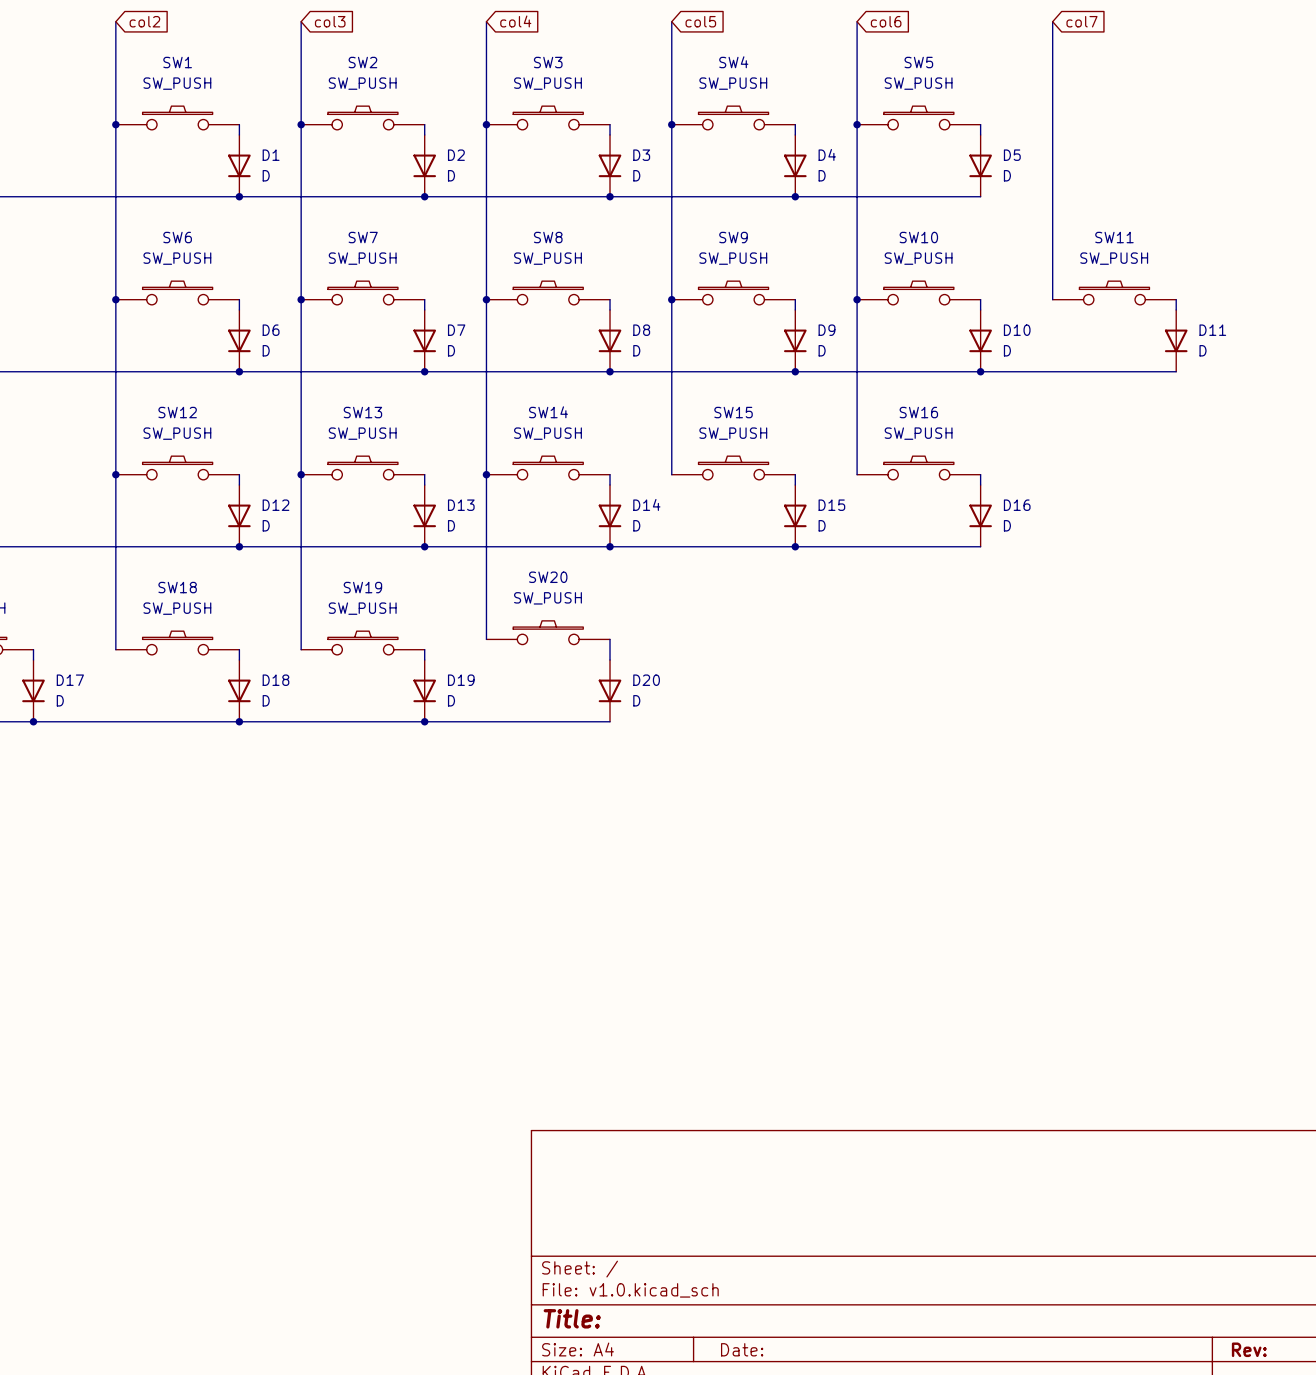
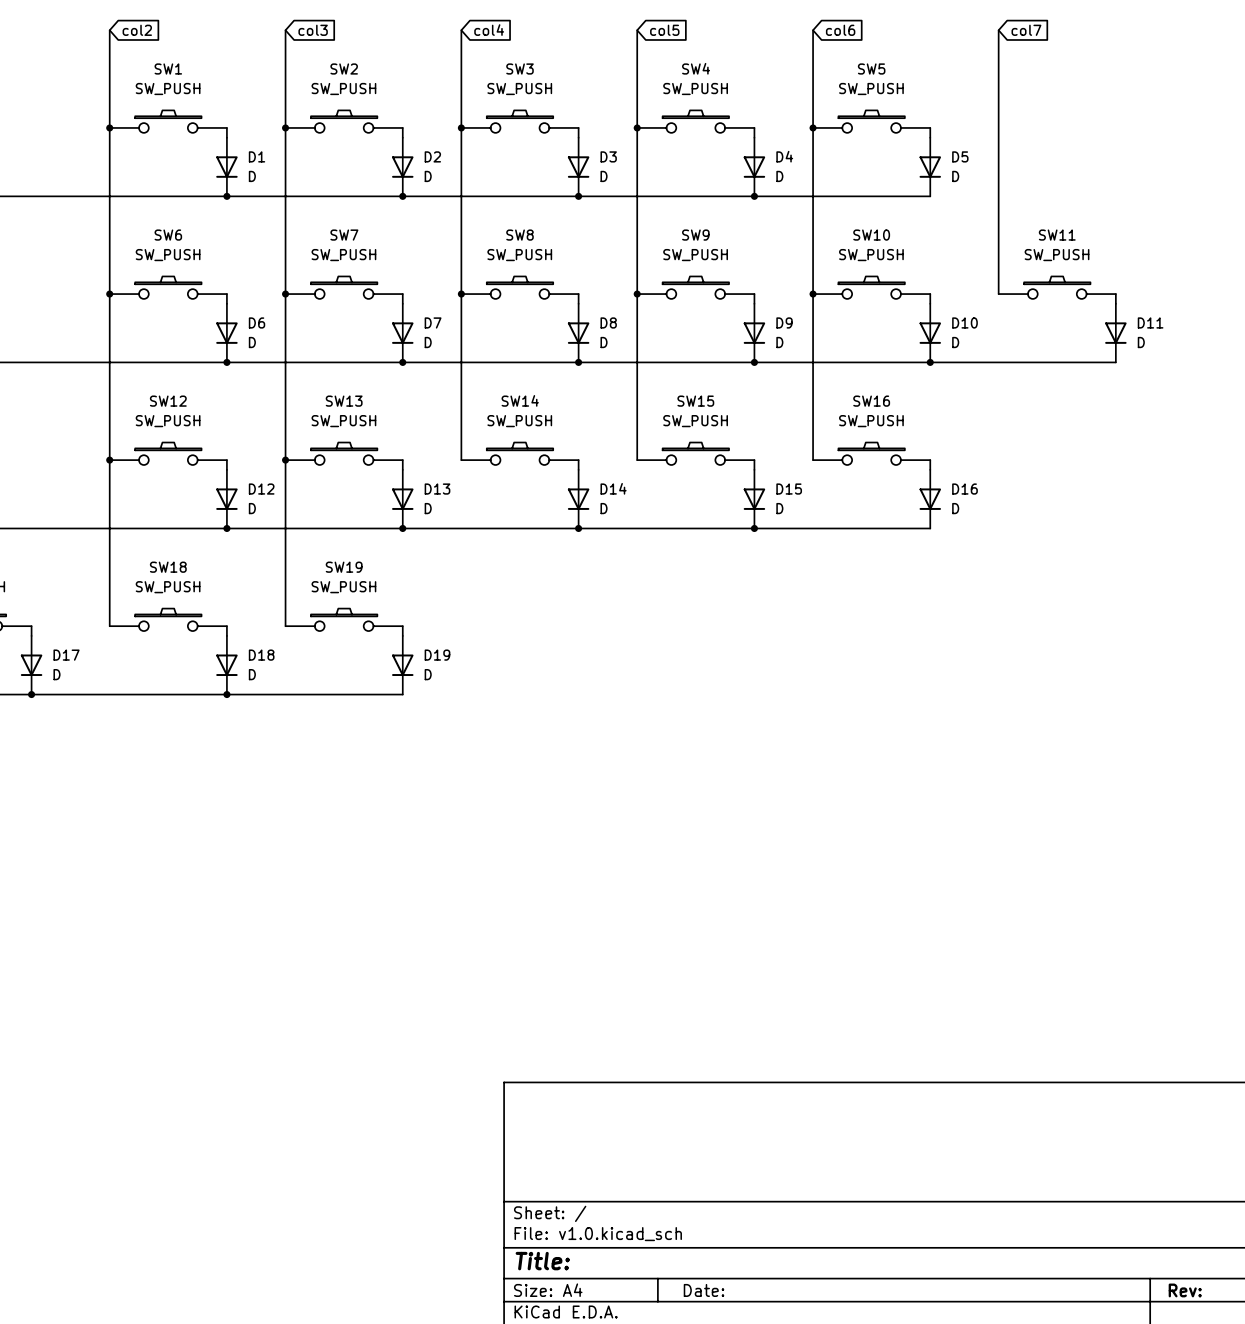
wire: (486, 474) (486, 639) -> none
junction: (486, 474) -> none
SW20: SW_PUSH (548, 632) -> none
wire: (610, 639) (610, 660) -> none
D20: D (610, 690) -> none
wire: (424, 721) (610, 721) -> none
junction: (424, 721) -> none

